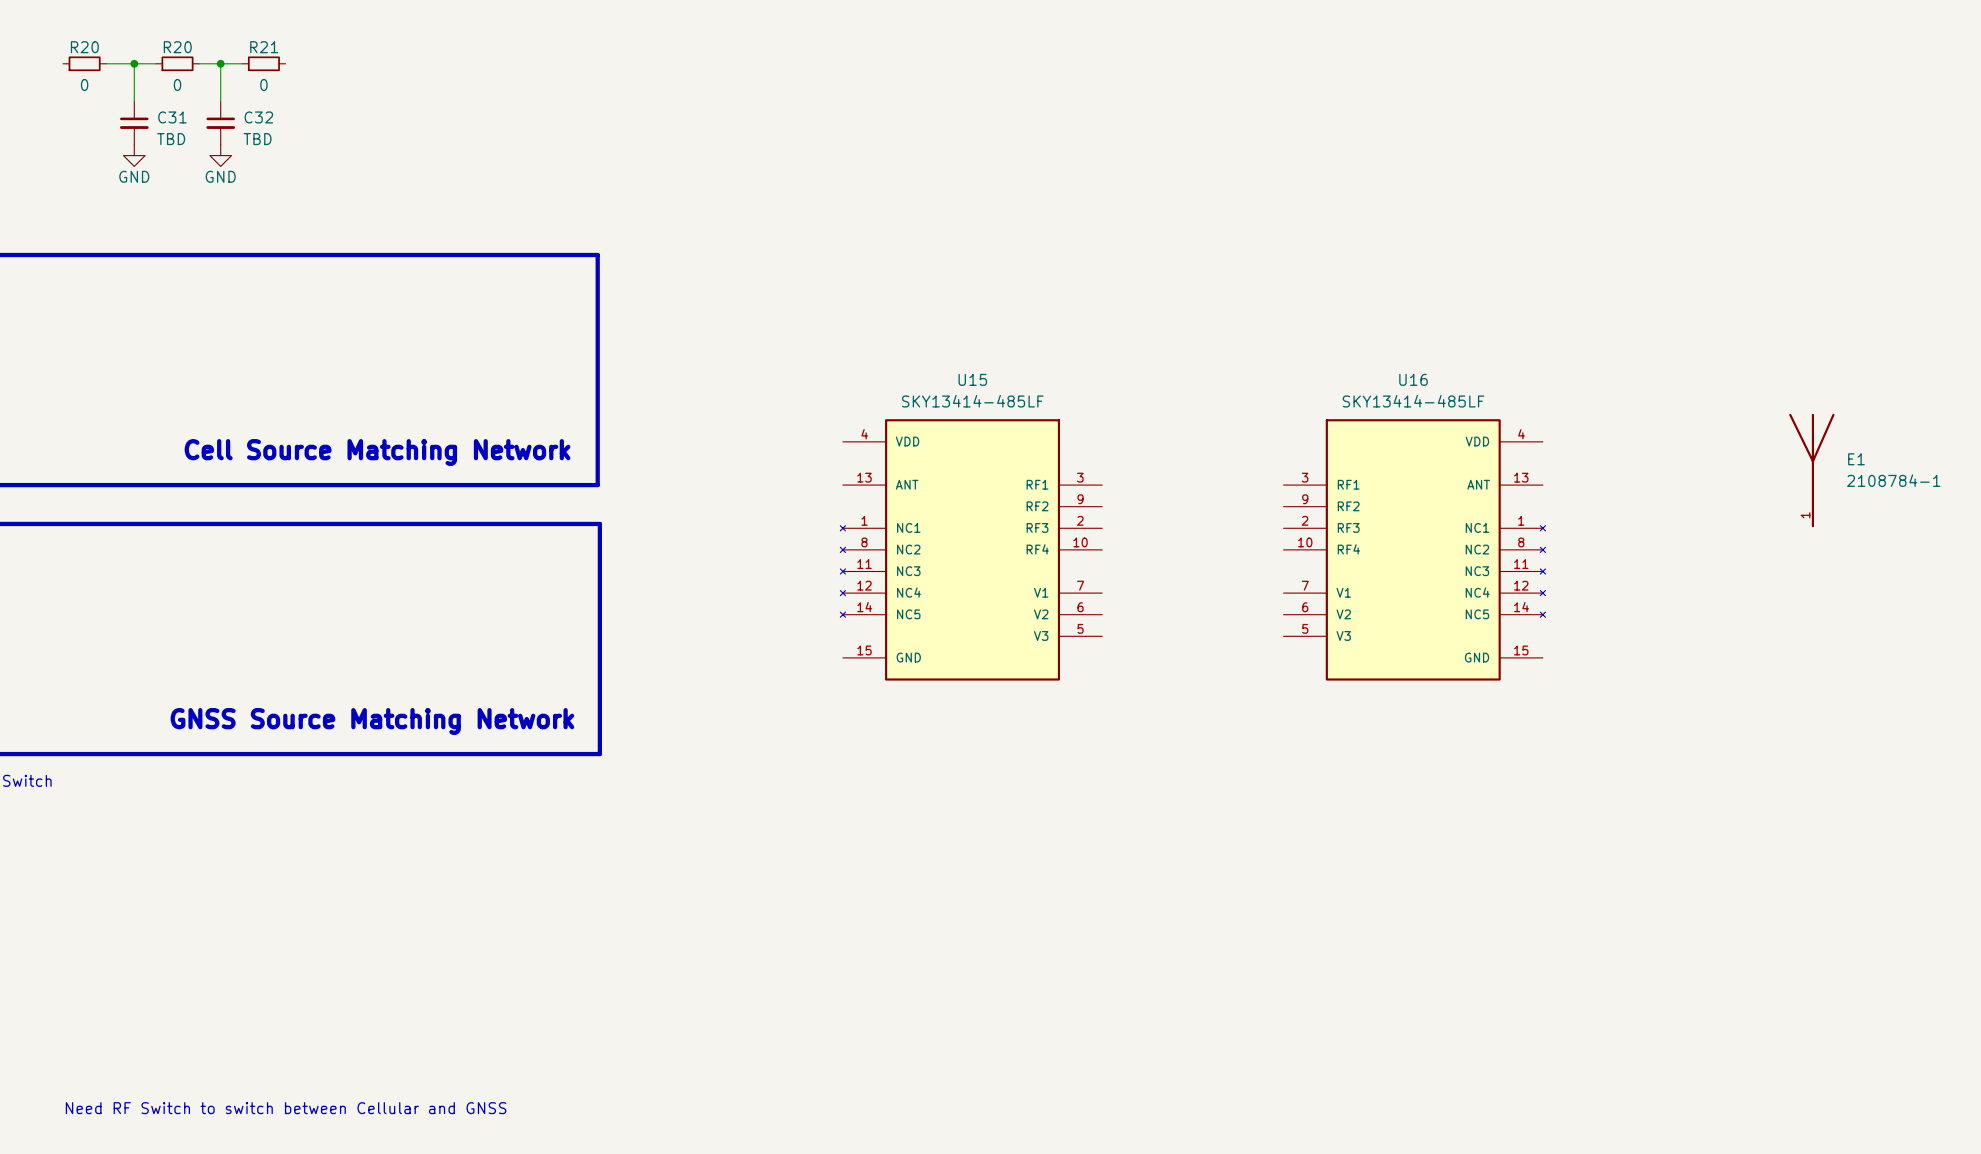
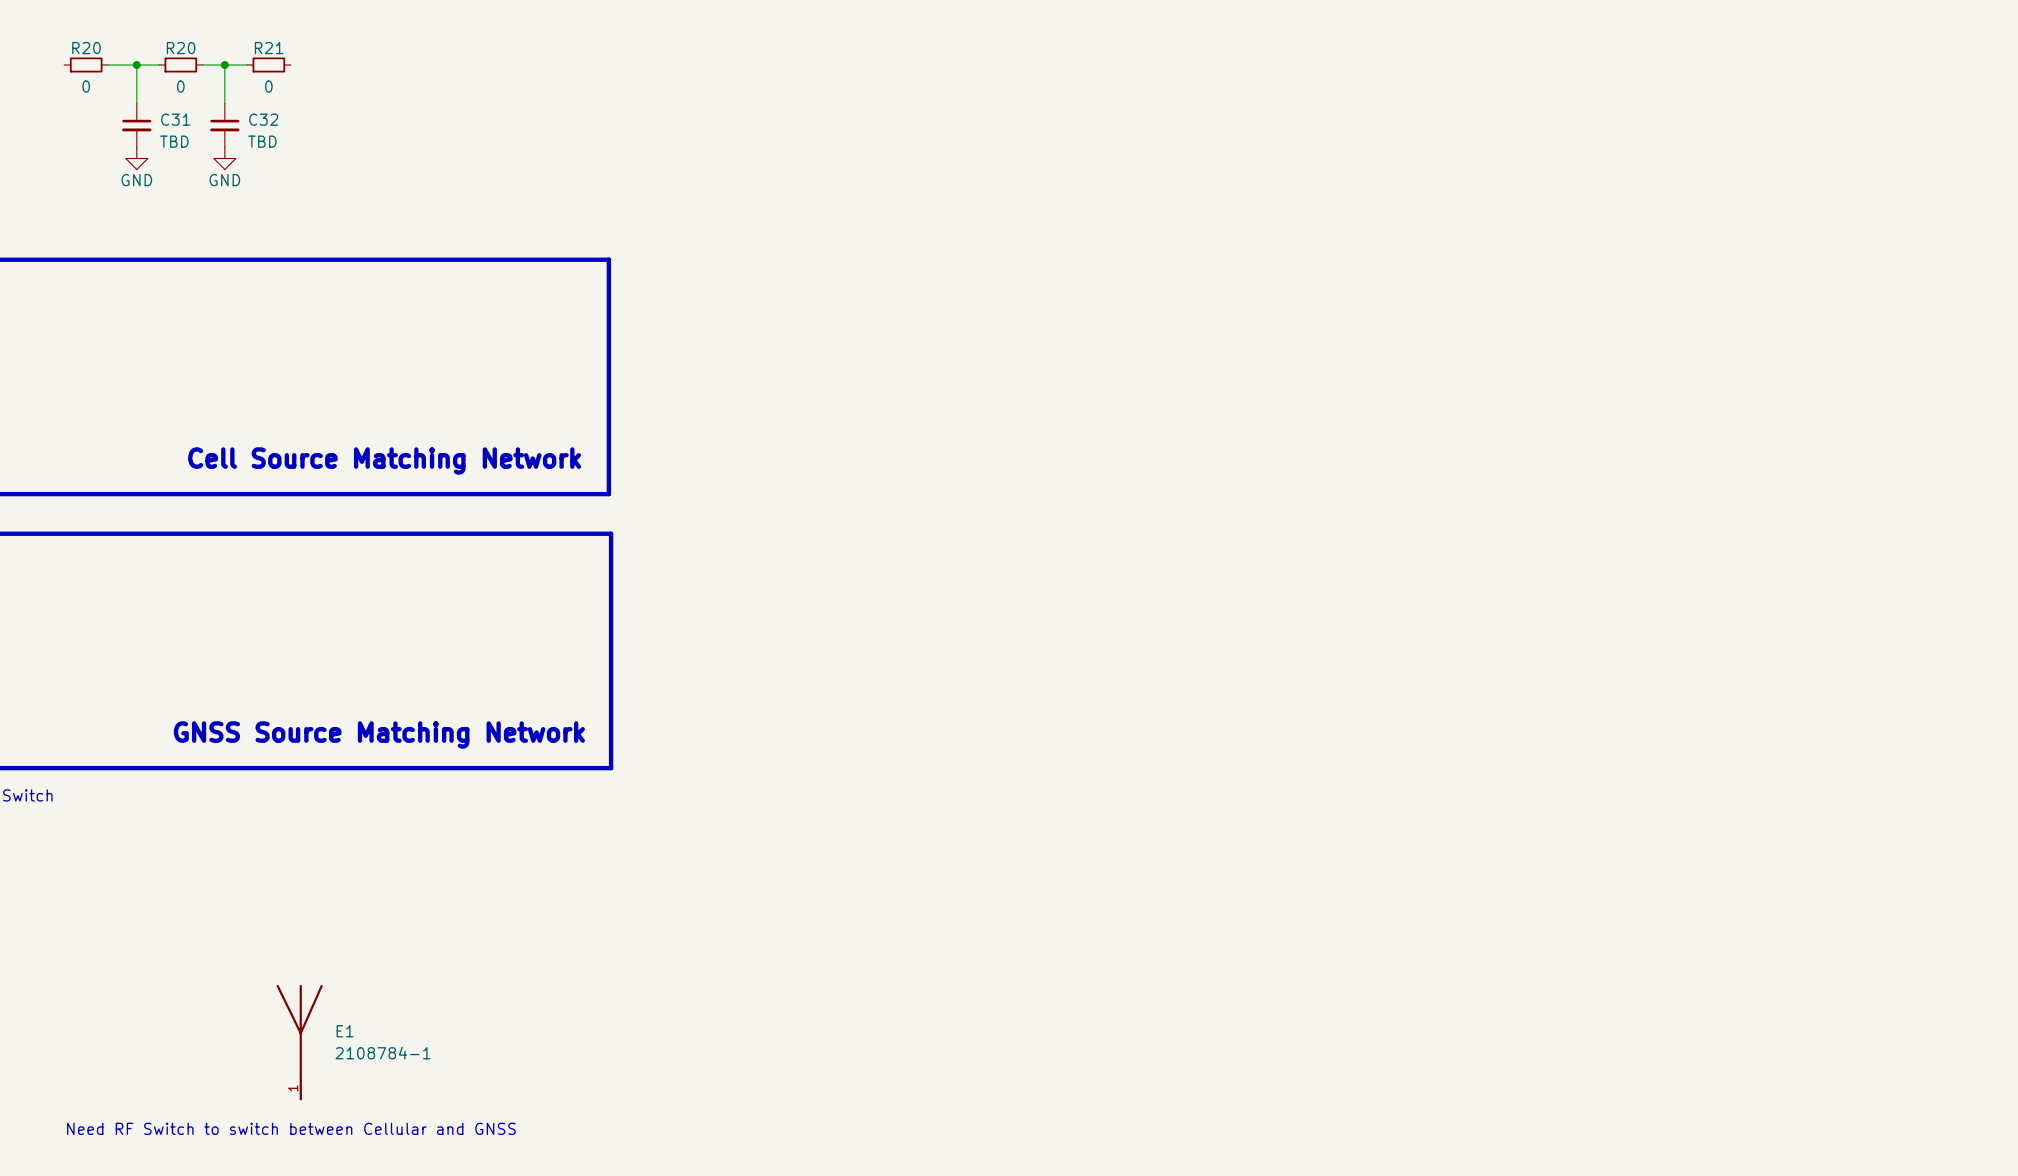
E1 position: (1811, 470) -> (299, 1042)
U15: SKY13414-485LF (971, 549) -> none
U16: SKY13414-485LF (1414, 549) -> none

